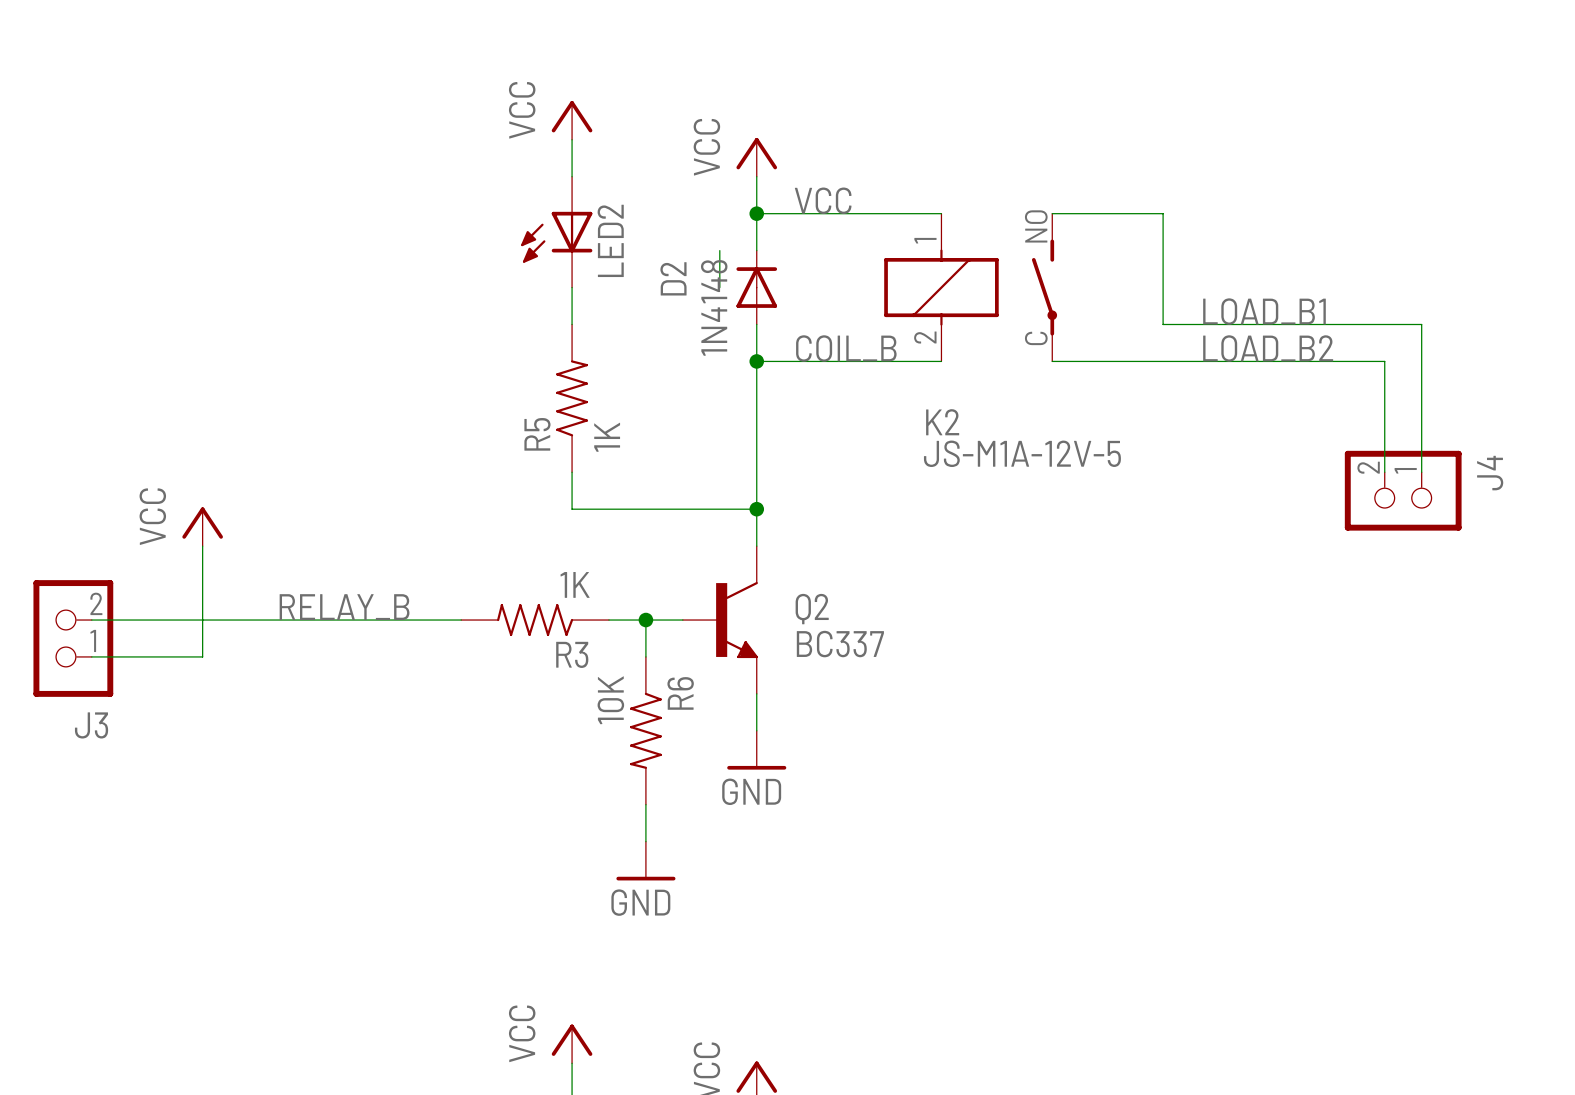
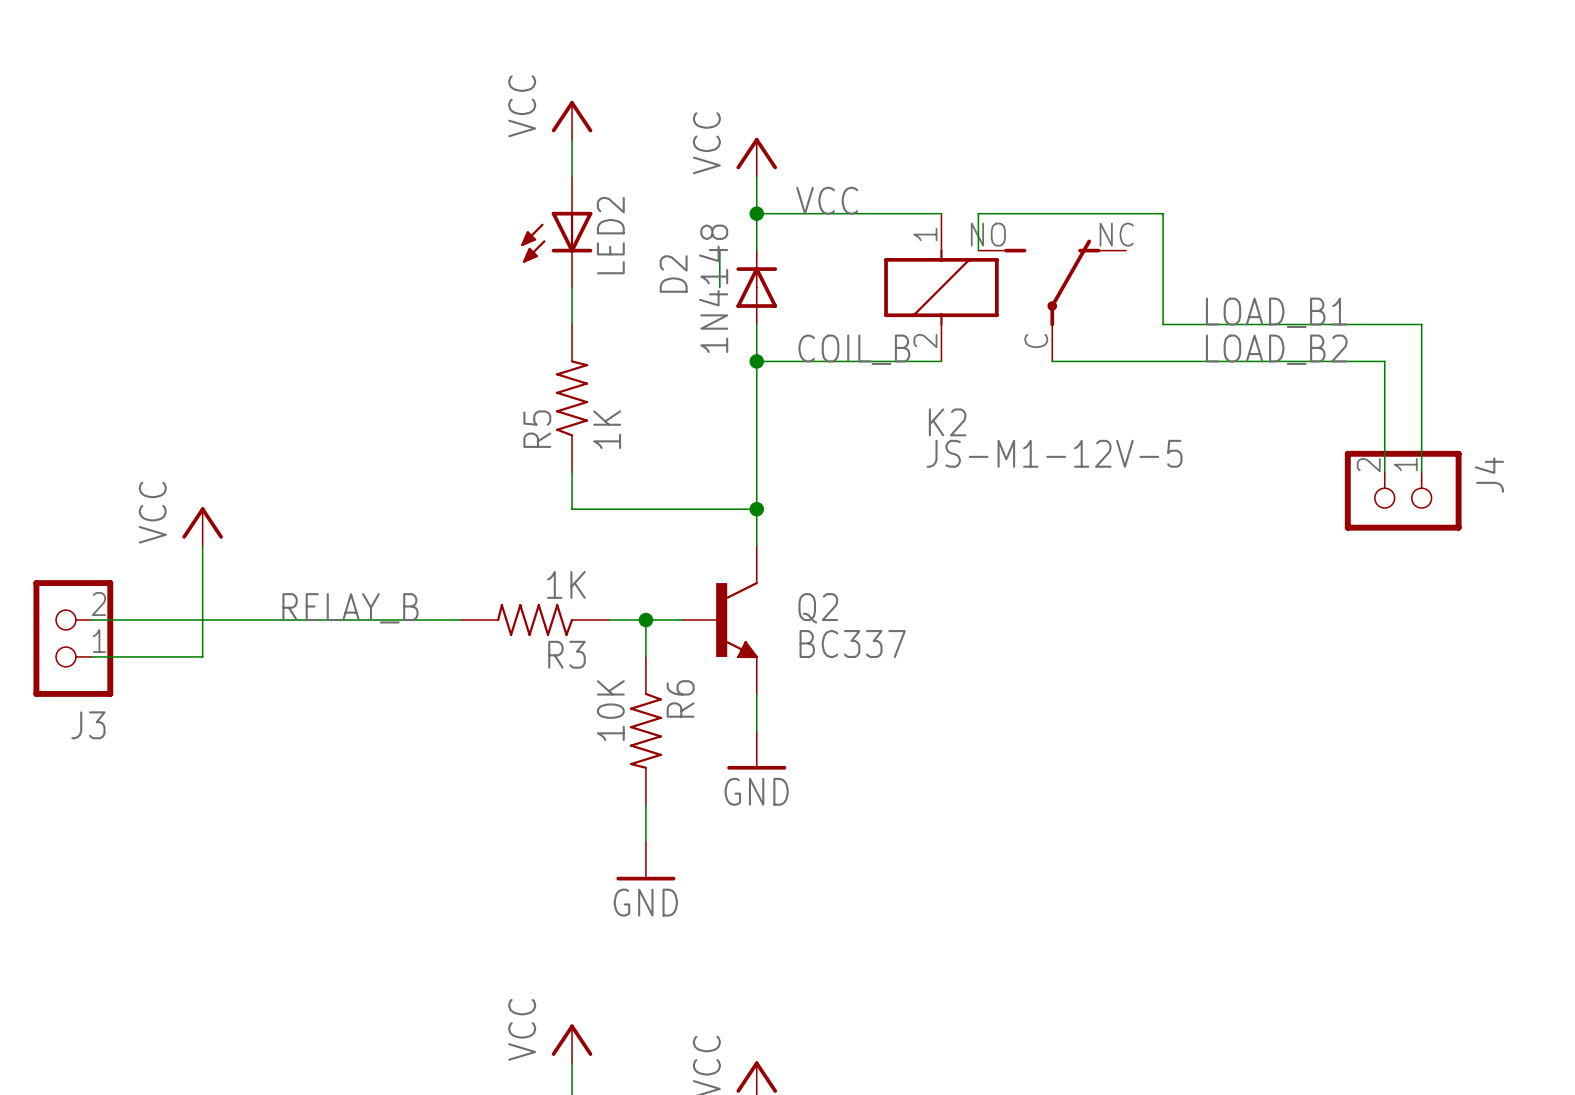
wire: none -> (1052, 213) (978, 213) (978, 250)
part: (1044, 287) -> none
part: none -> (1052, 300)
K2 value: JS-M1A-12V-5 (1022, 453) -> JS-M1-12V-5 (1054, 453)

